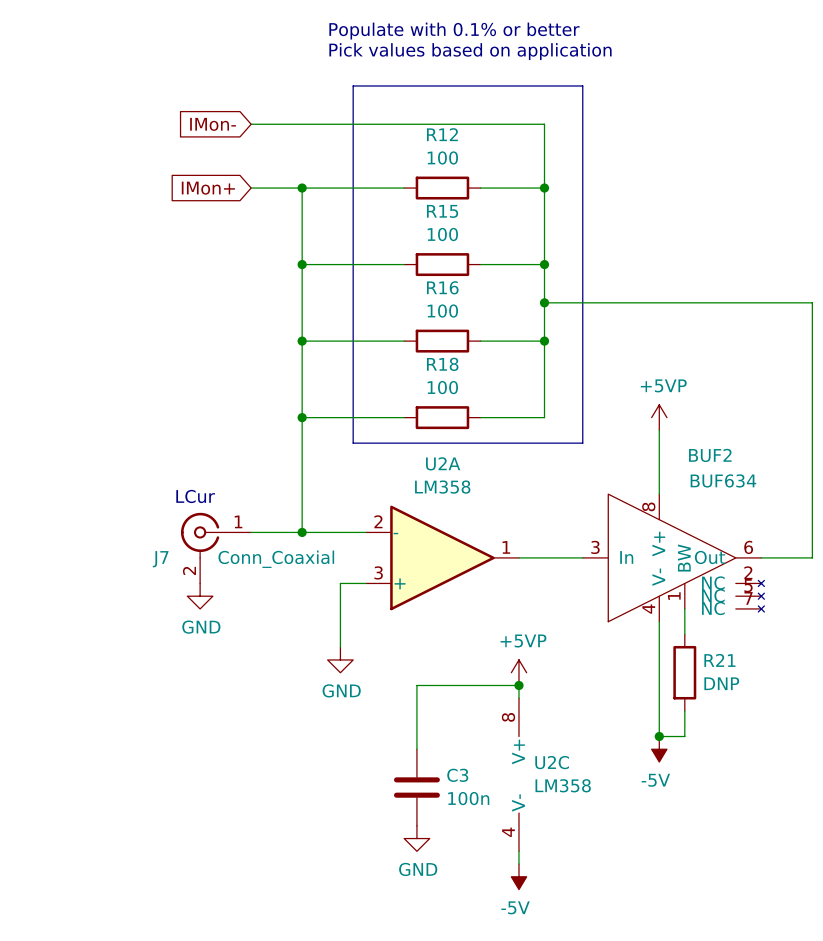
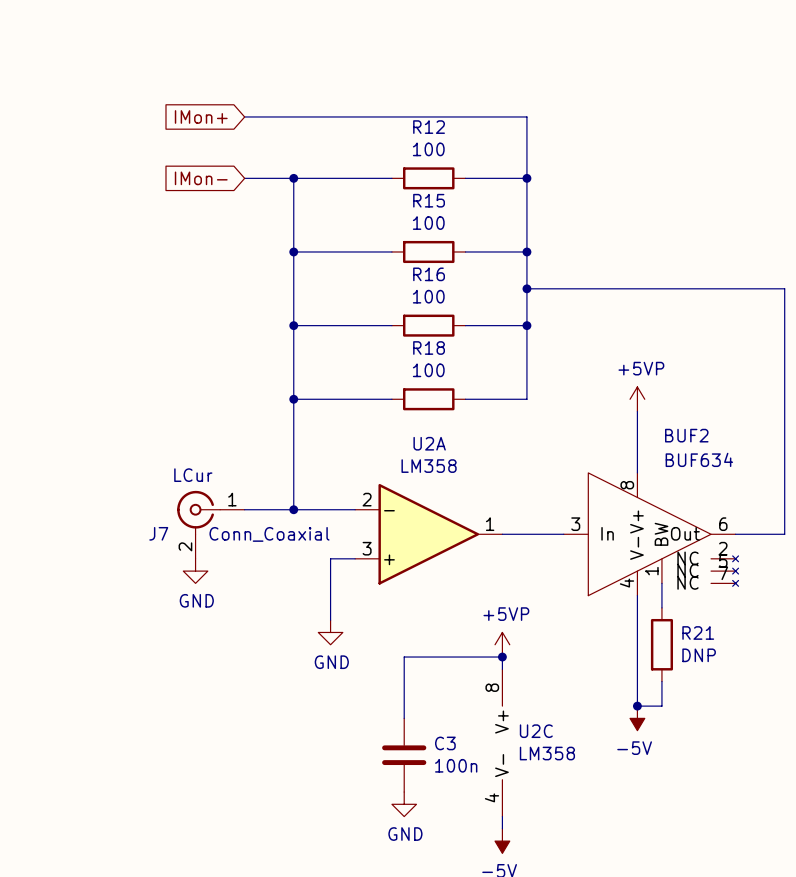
text: Populate with 0.1% or better (454, 31) -> none
text: Pick values based on application (470, 51) -> none
line: (353, 85) (353, 443) (582, 443) (582, 85) (353, 85) -> none
global label: IMon- (213, 124) -> IMon+ (201, 116)
global label: IMon+ (208, 188) -> IMon- (201, 178)

